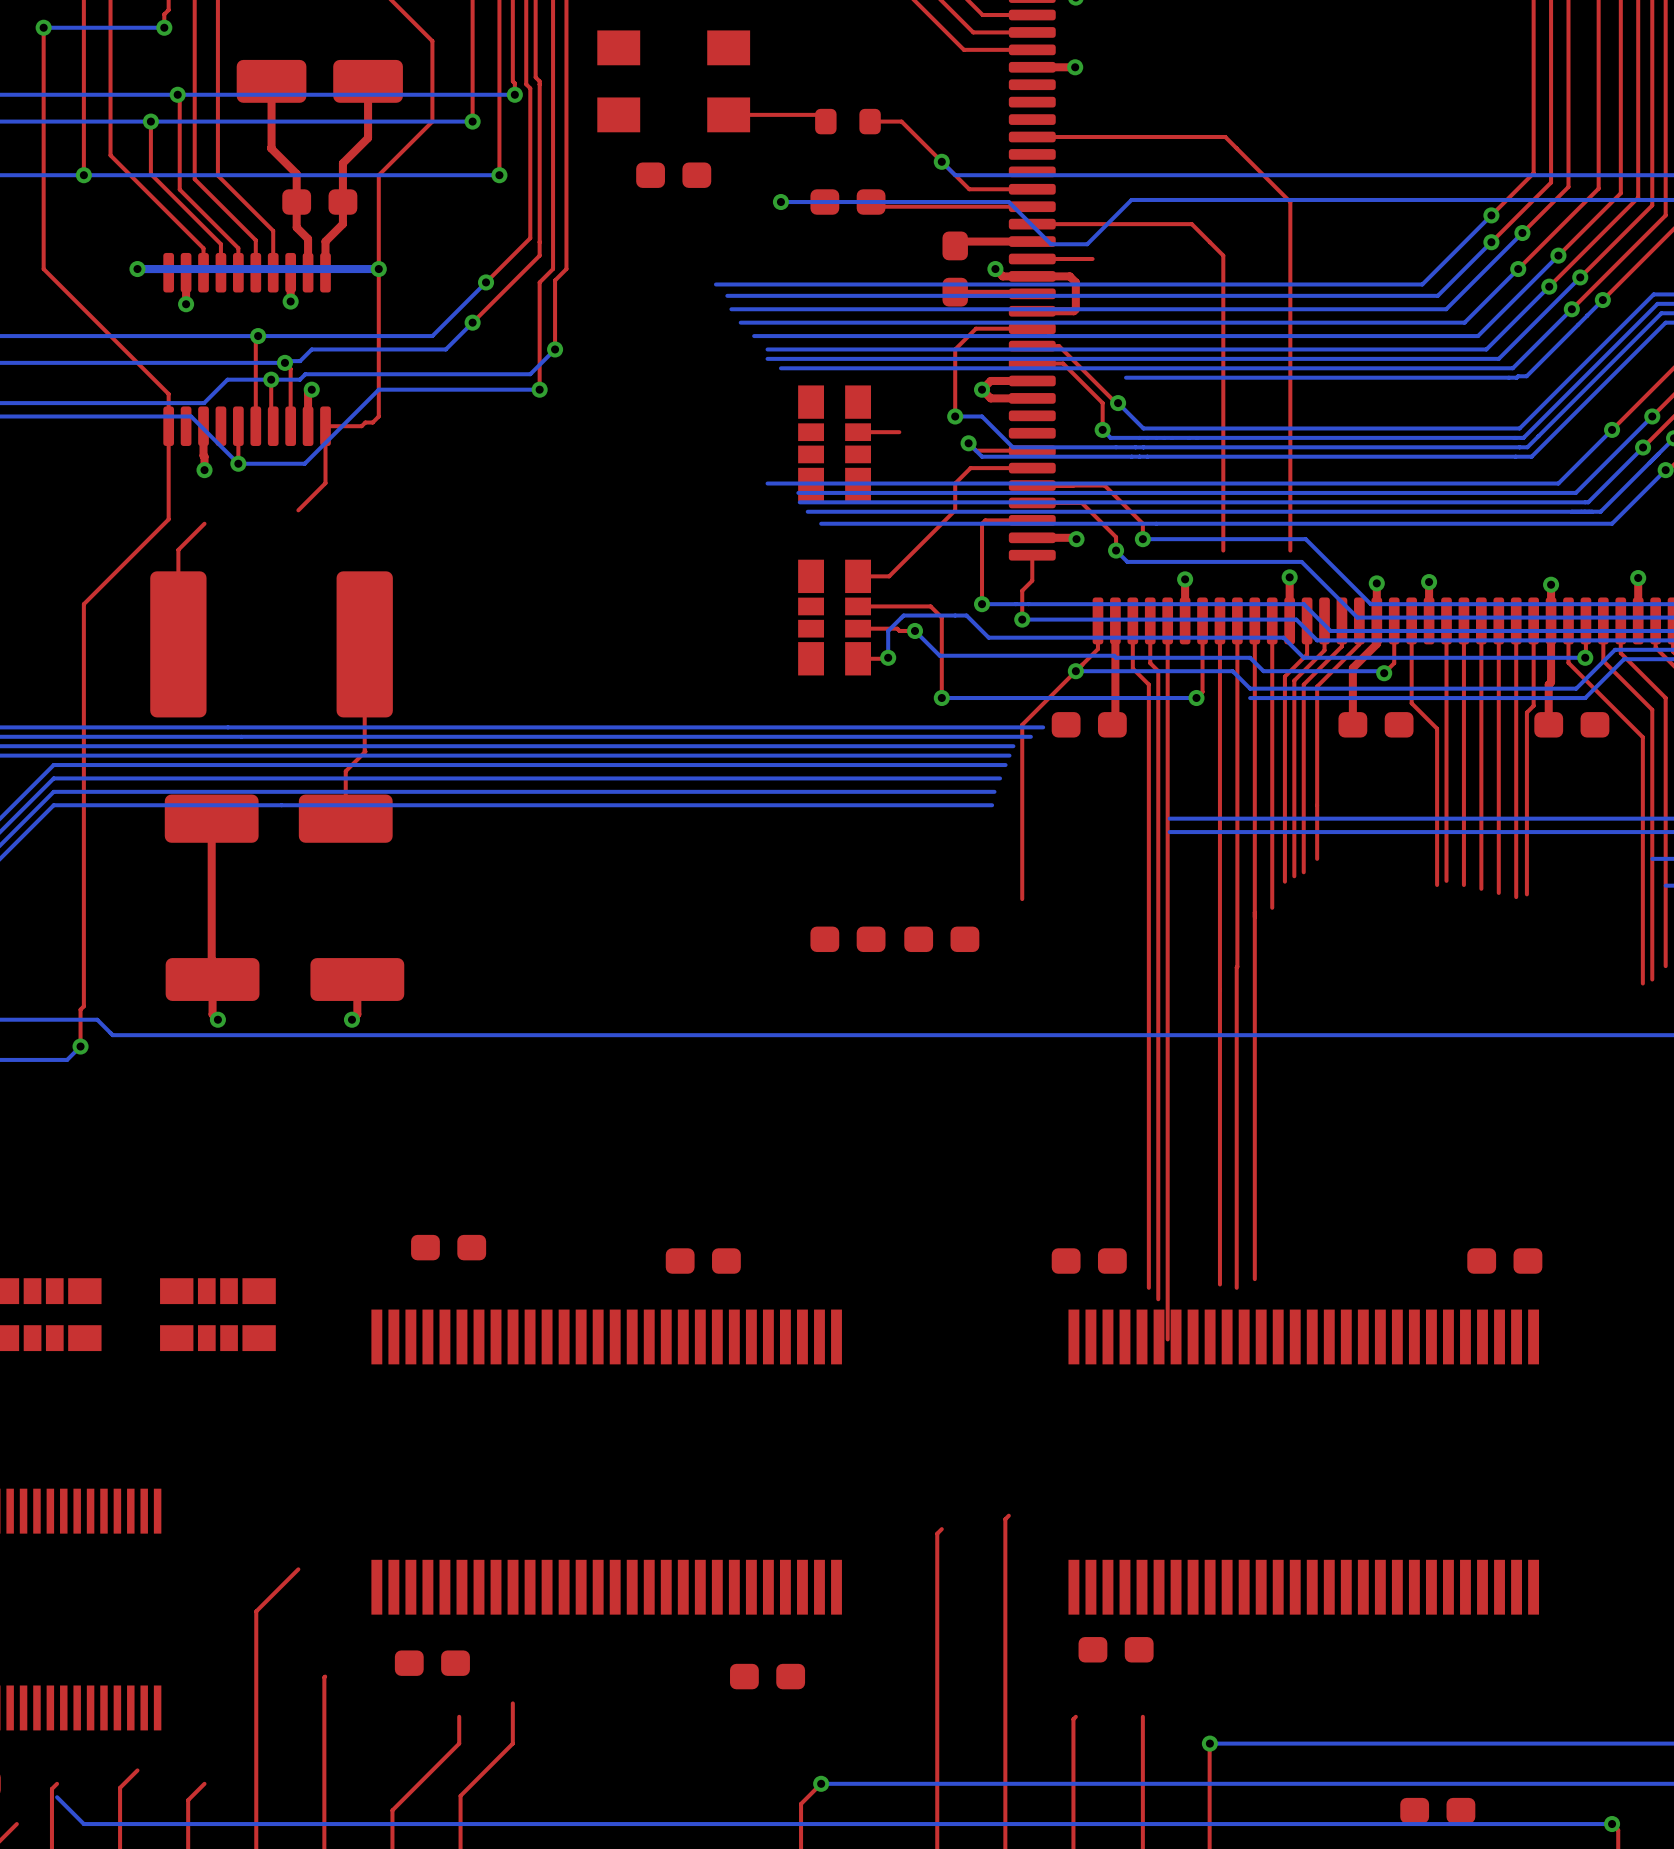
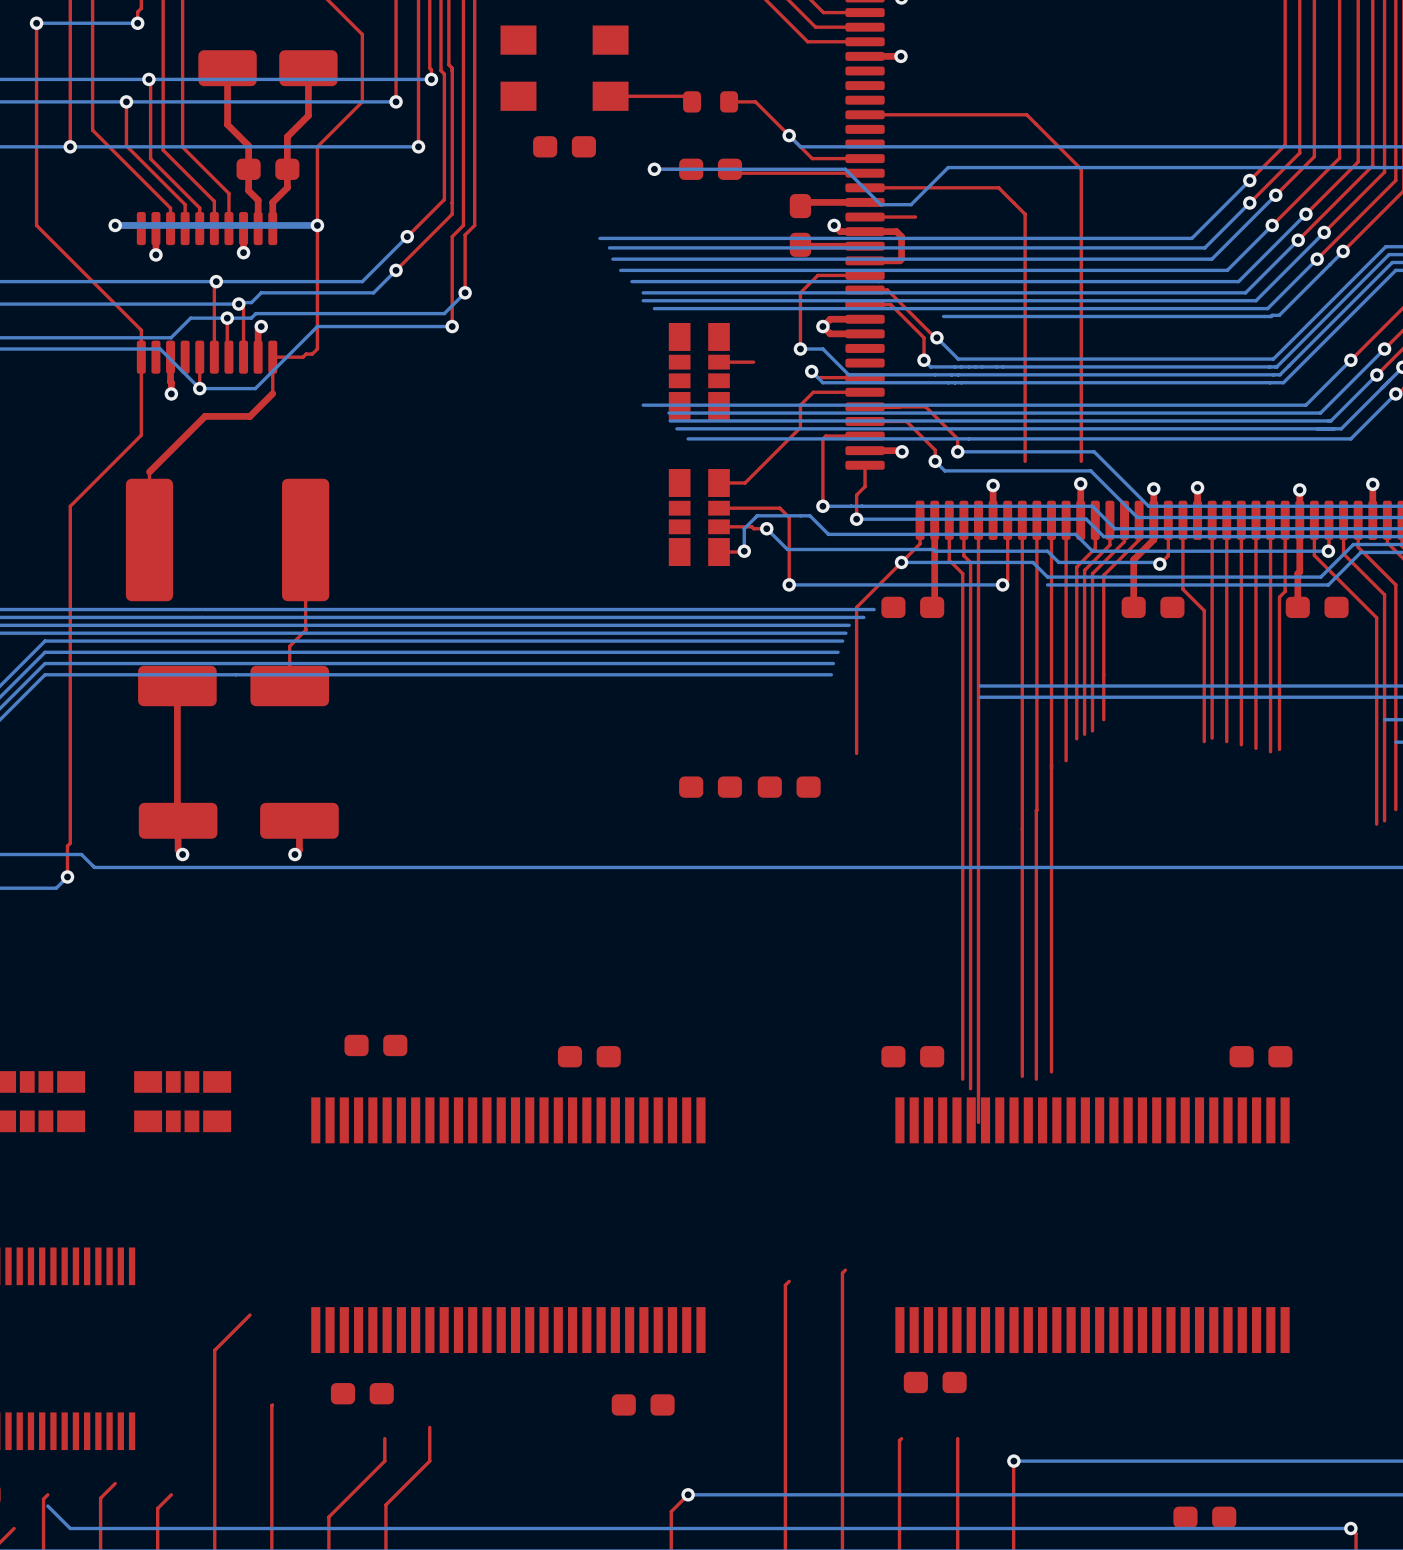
top track: (325, 469) (325, 483) (298, 510) -> (272, 393) (250, 416) (205, 416) (149, 472)
top track: (204, 523) (178, 549) (178, 563) -> none

